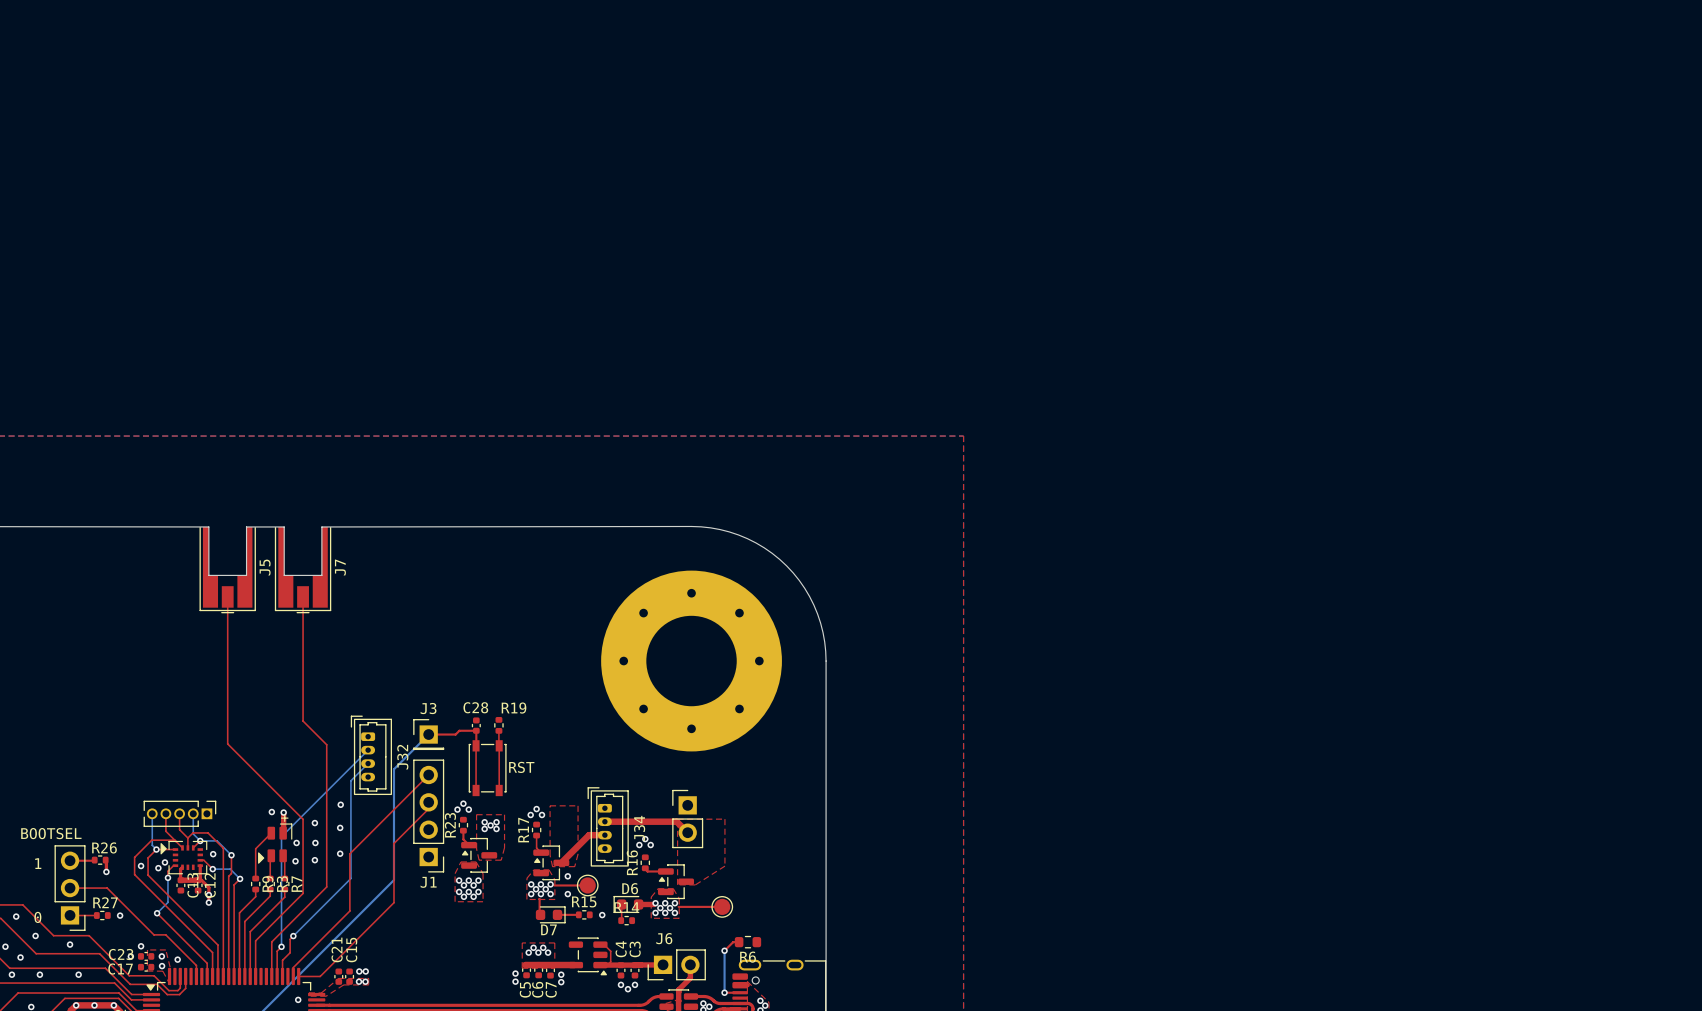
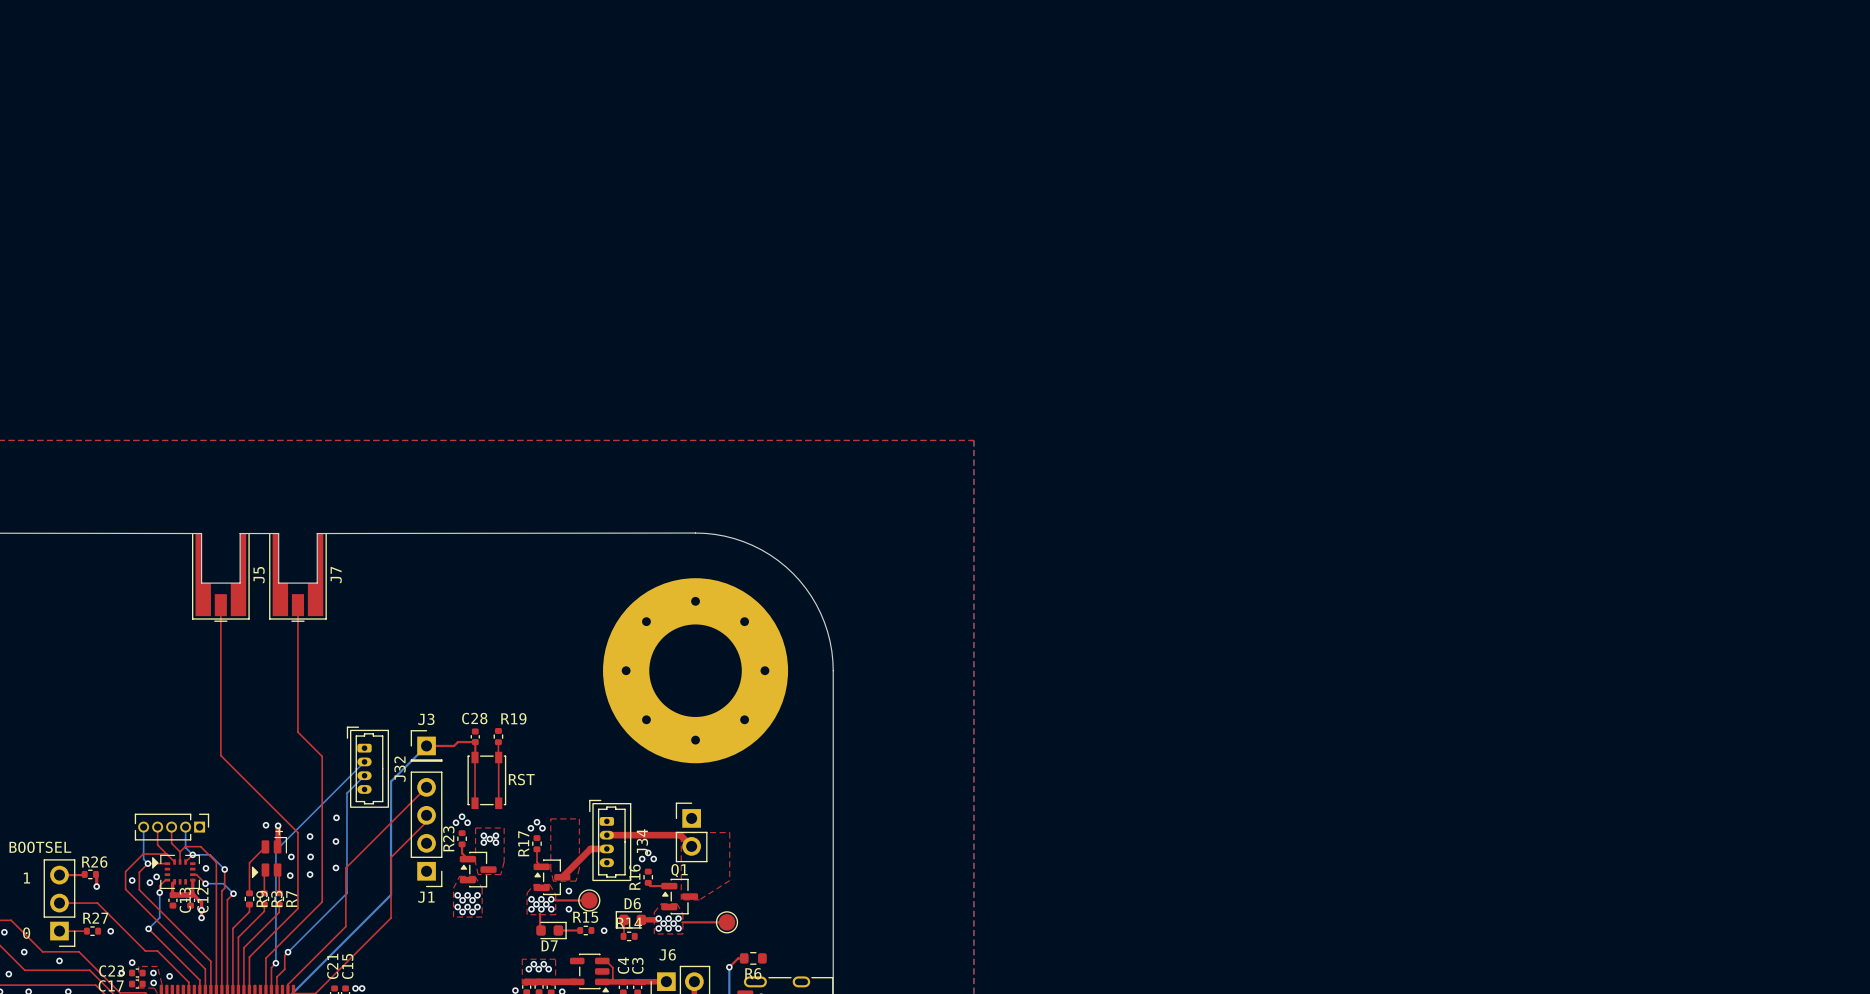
Q1 name: none -> Q1 (679, 870)

